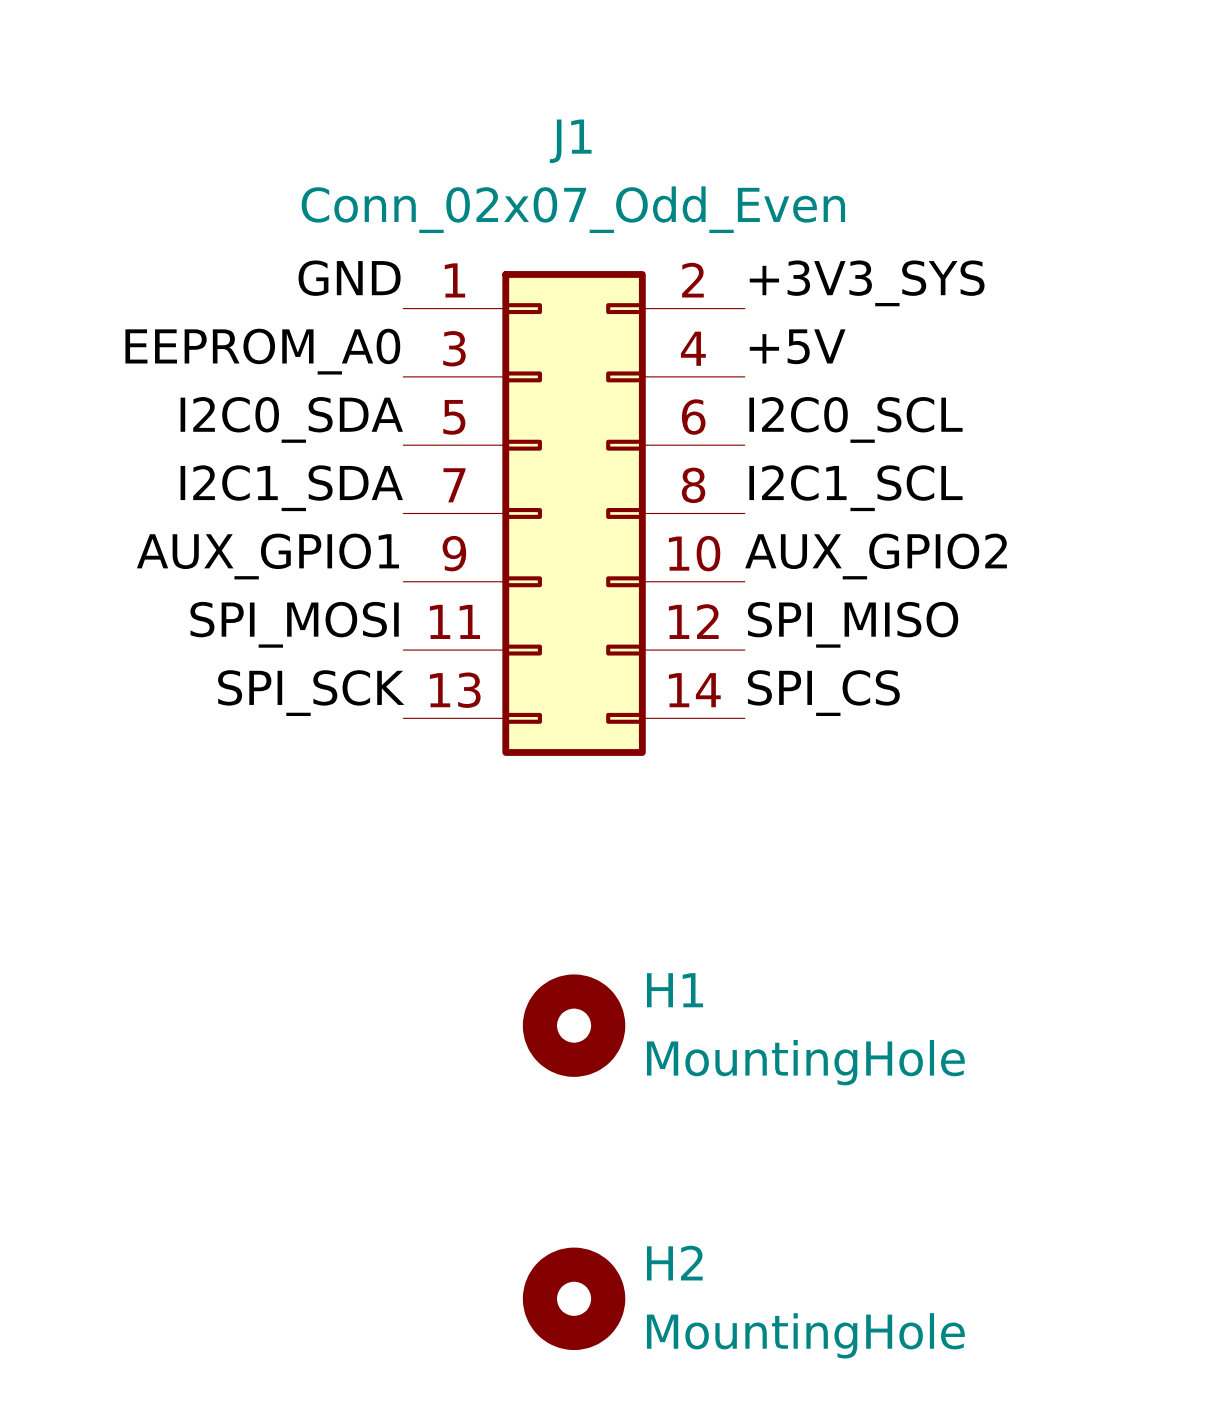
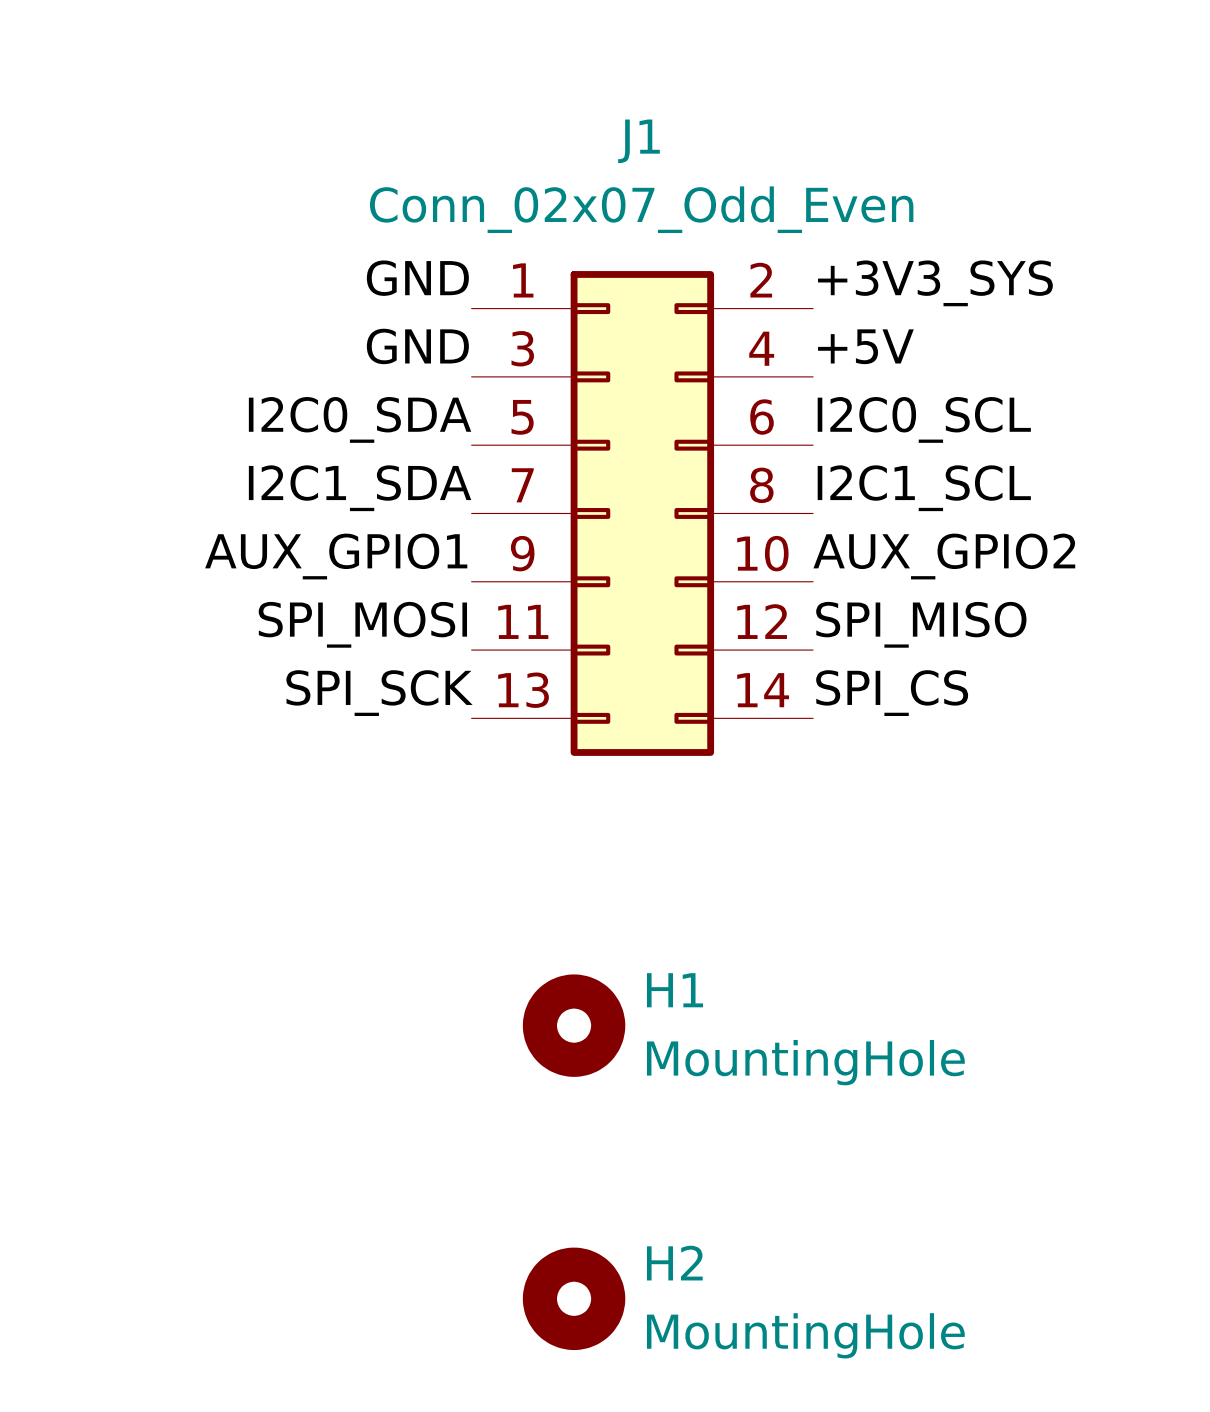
label: GND (349, 278) -> none
label: none -> GND (417, 278)
label position: +3V3_SYS (867, 283) -> +3V3_SYS (935, 283)
label: none -> GND (417, 346)
label position: +5V (797, 346) -> +5V (865, 346)
label: EEPROM_A0 (262, 351) -> none
label position: I2C0_SDA (291, 419) -> I2C0_SDA (360, 419)
label position: I2C0_SCL (855, 419) -> I2C0_SCL (924, 419)
label position: I2C1_SDA (291, 488) -> I2C1_SDA (360, 488)
label position: I2C1_SCL (855, 488) -> I2C1_SCL (924, 488)
J1 position: (574, 513) -> (642, 513)
label position: AUX_GPIO1 (267, 556) -> AUX_GPIO1 (336, 556)
label position: AUX_GPIO2 (876, 556) -> AUX_GPIO2 (944, 556)
label position: SPI_MOSI (294, 624) -> SPI_MOSI (362, 624)
label position: SPI_MISO (853, 624) -> SPI_MISO (921, 624)
label position: SPI_SCK (311, 693) -> SPI_SCK (379, 693)
label position: SPI_CS (823, 693) -> SPI_CS (892, 693)

